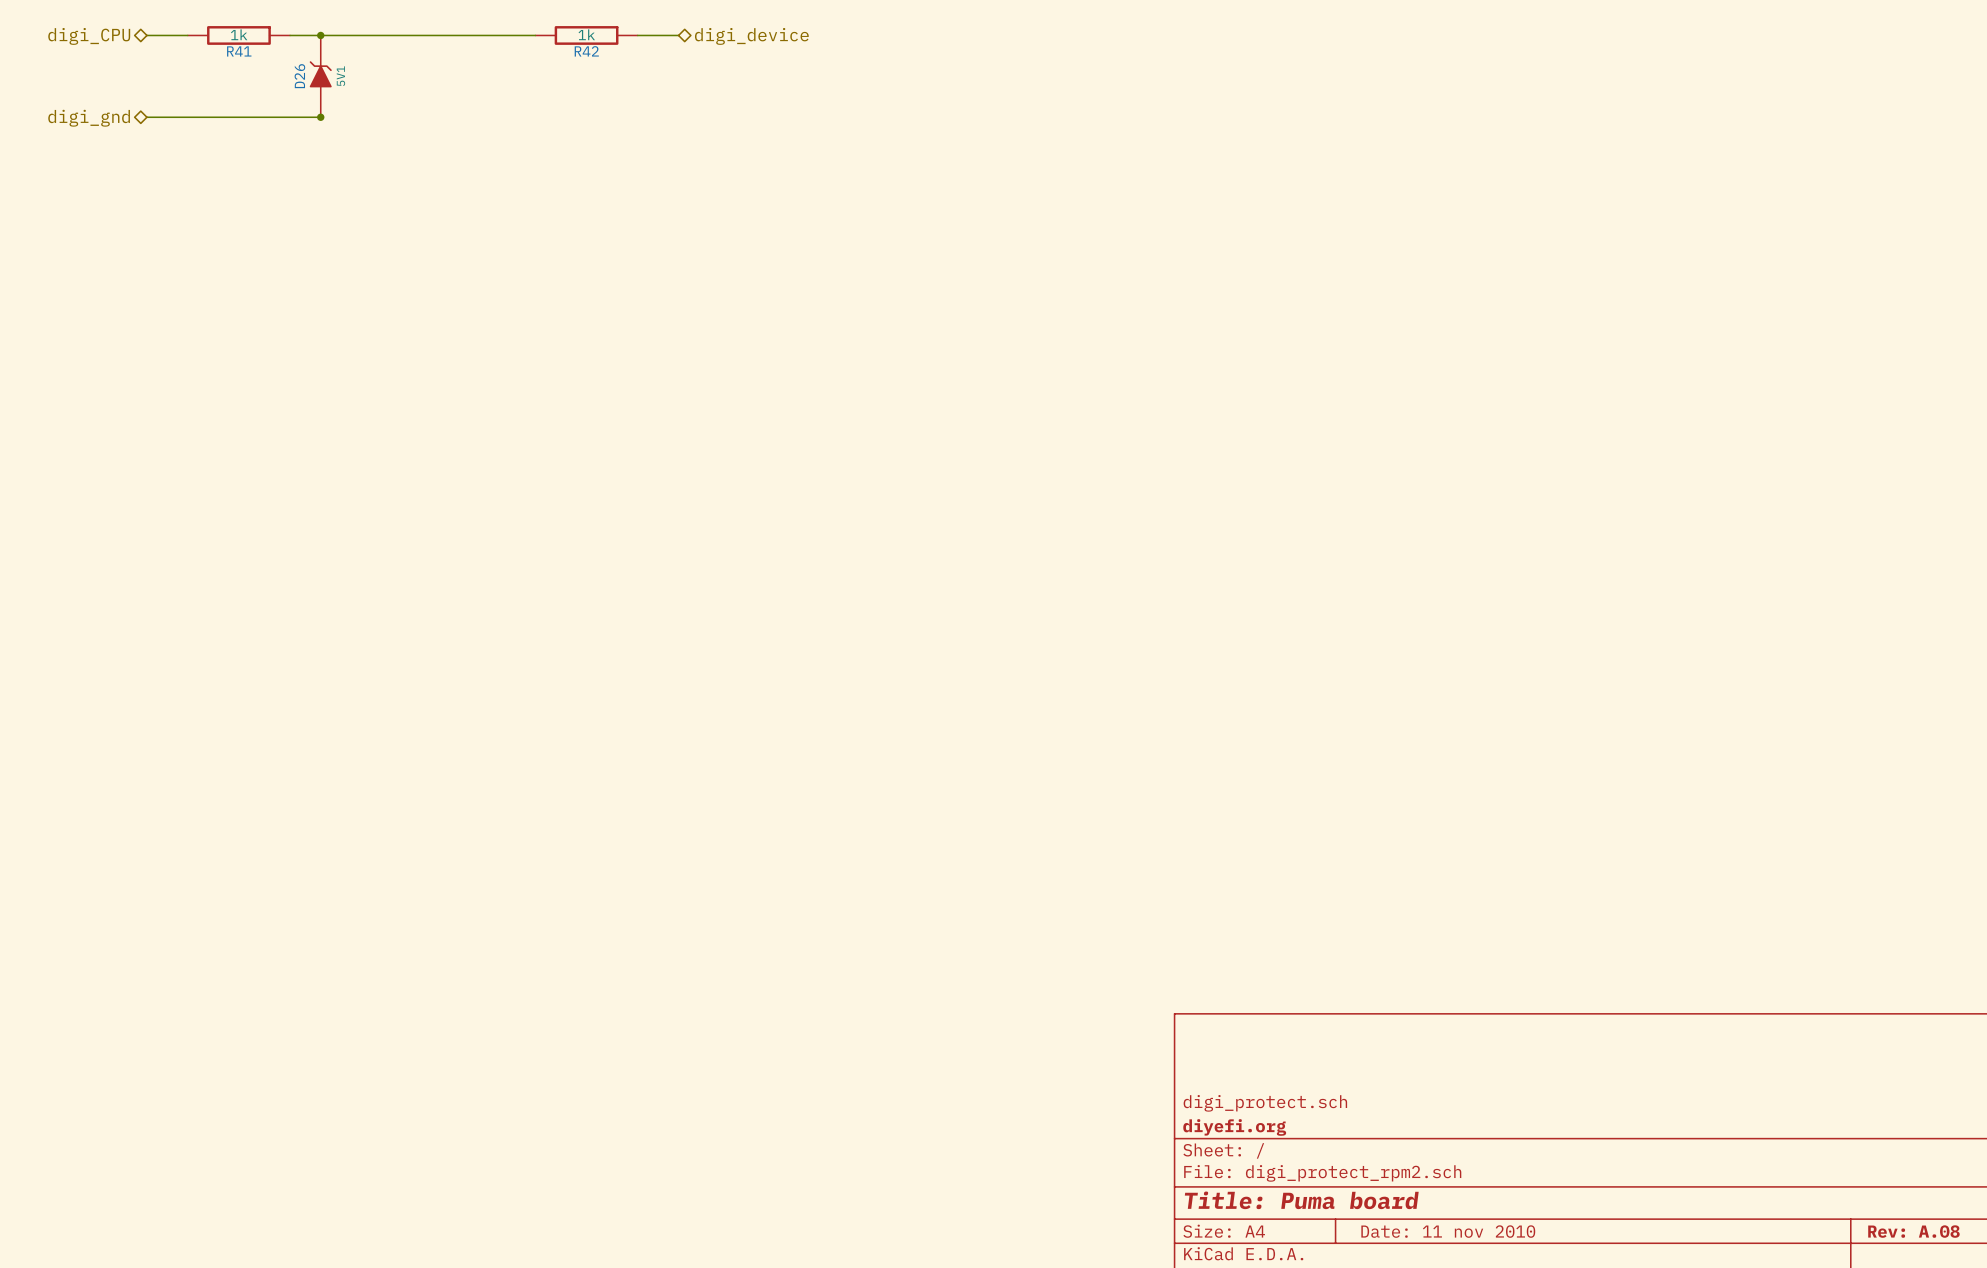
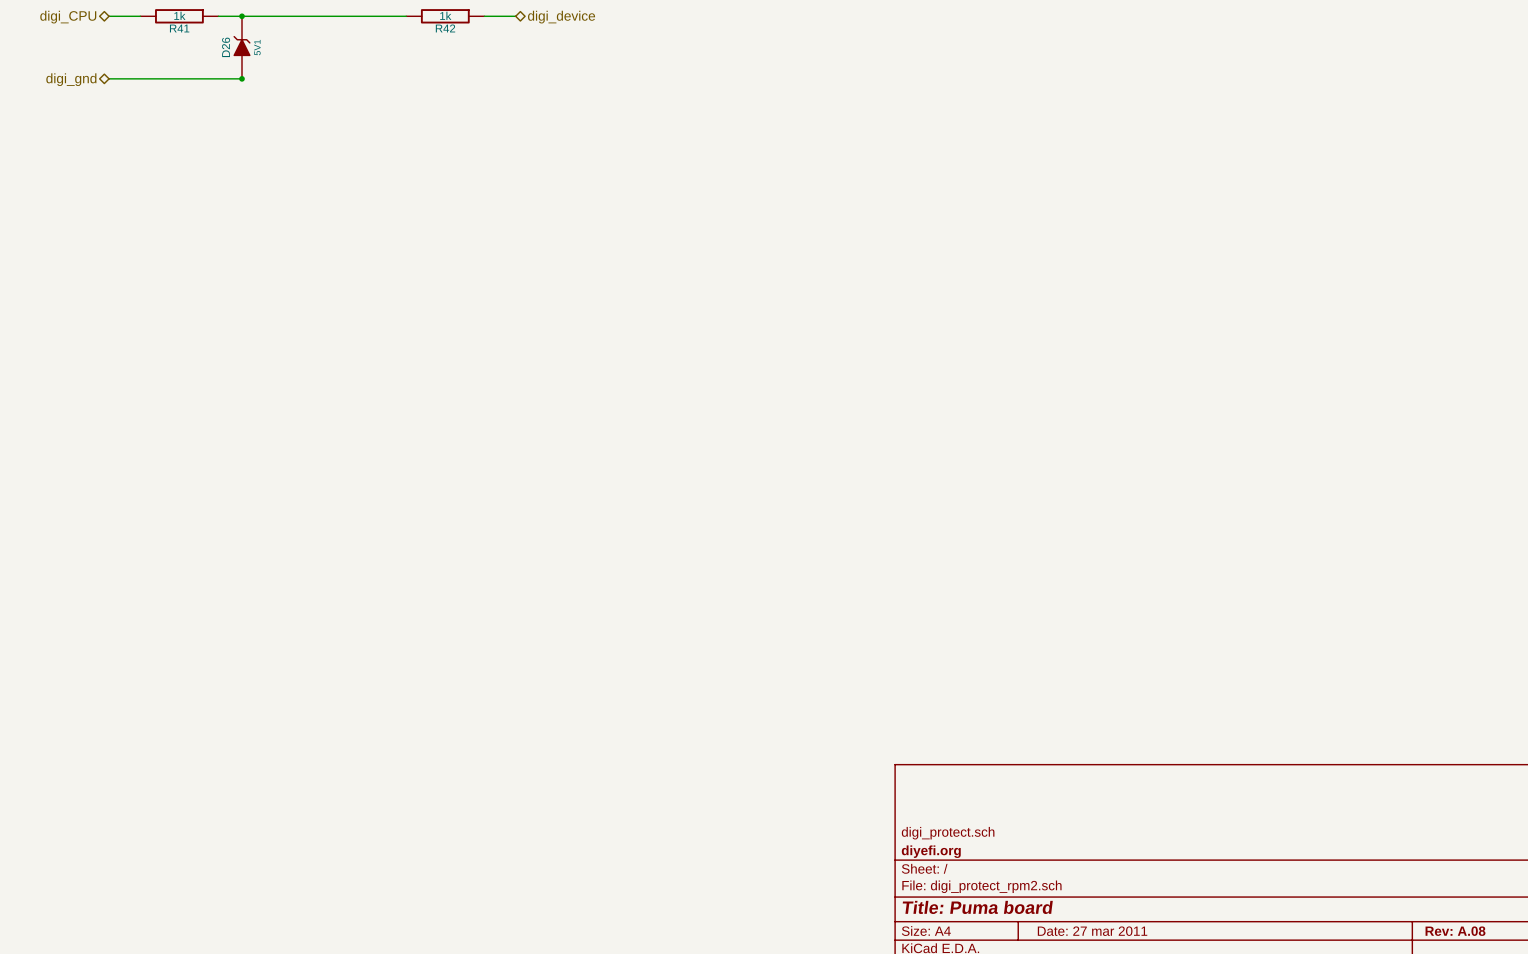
title block: Date: 11 nov 2010 (1448, 1231) -> Date: 27 mar 2011 (1092, 931)

